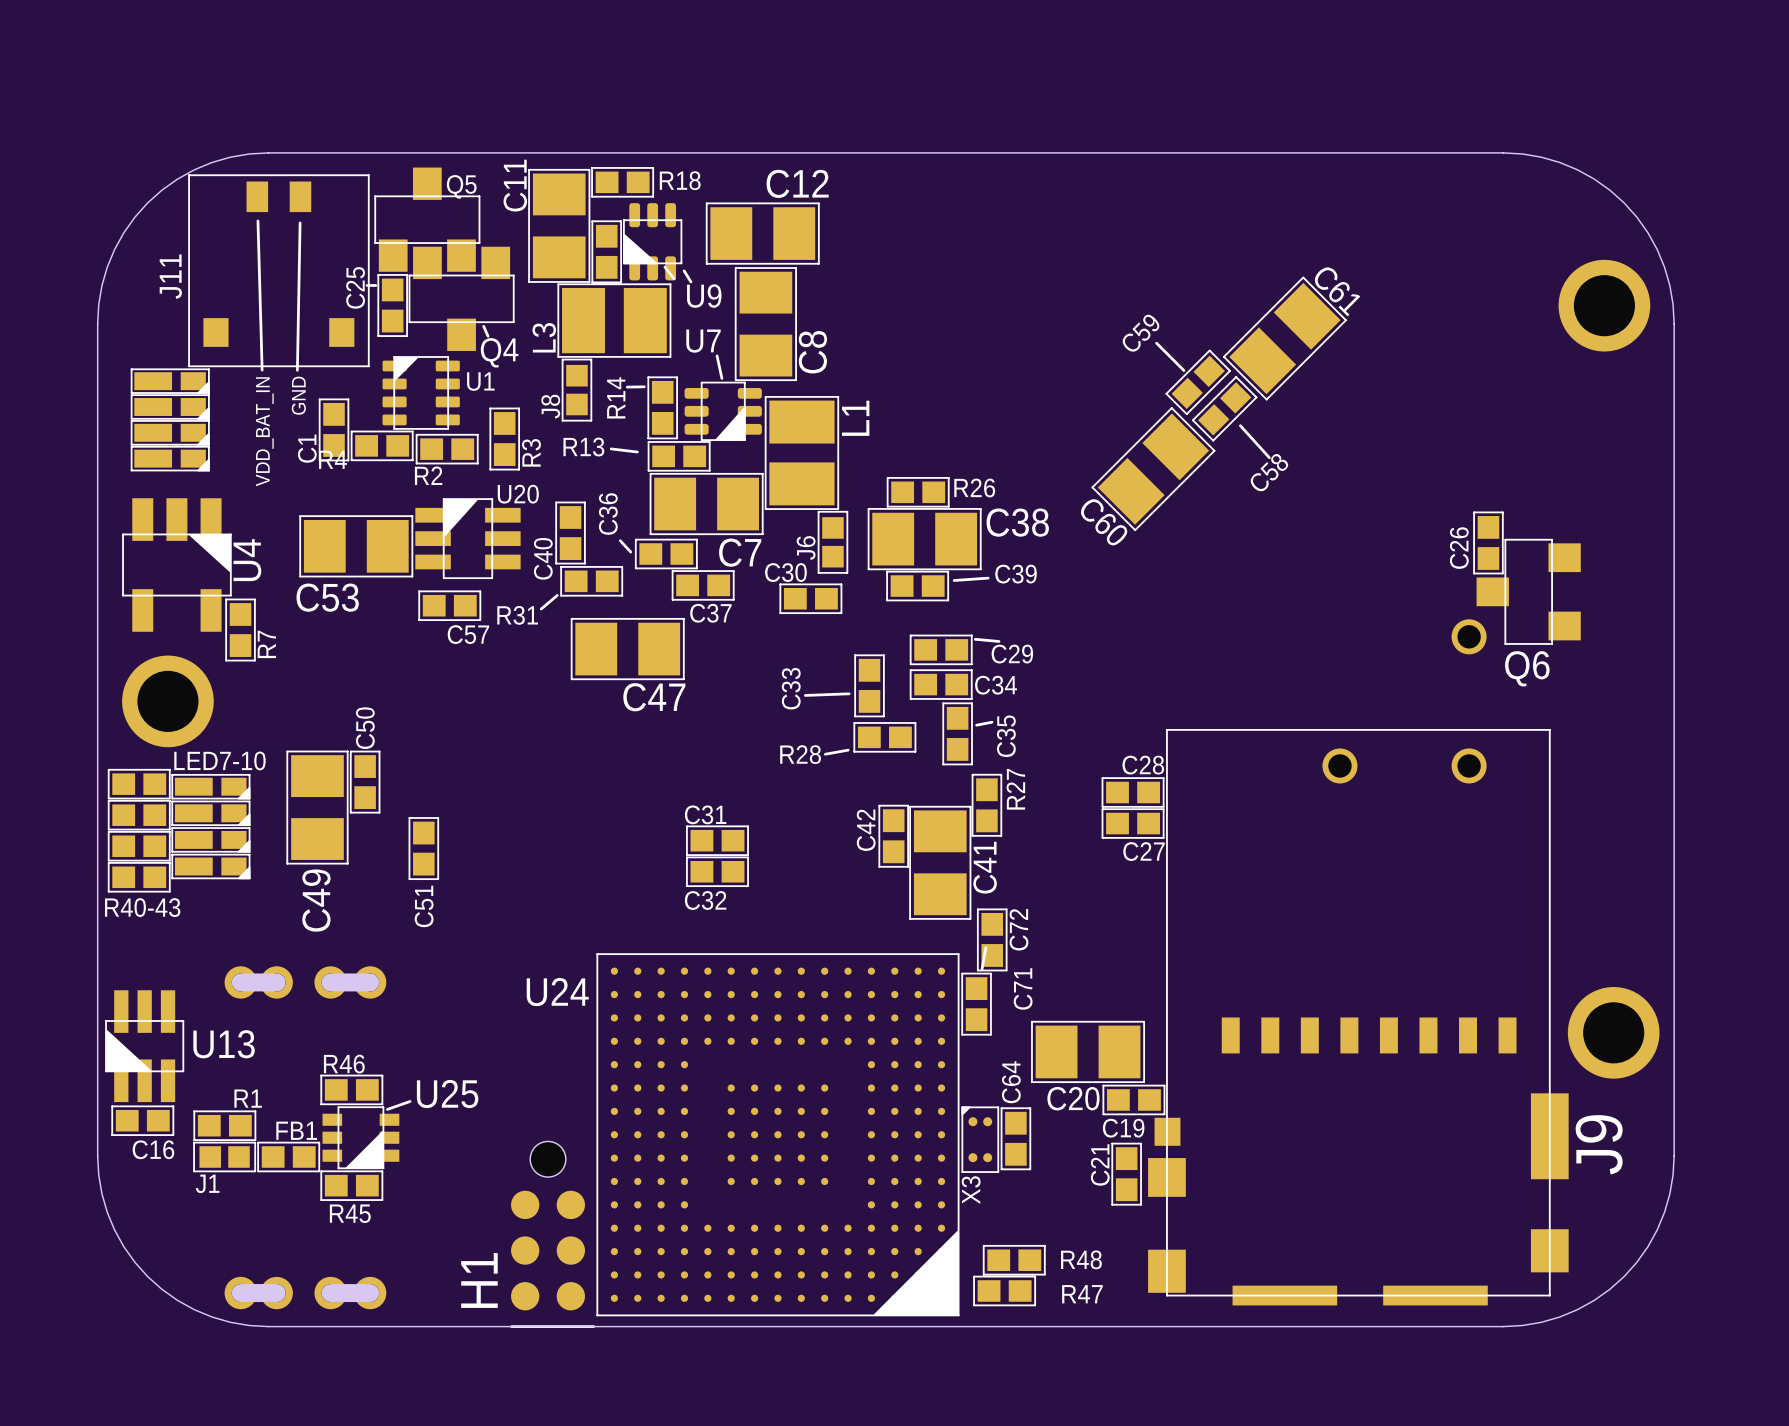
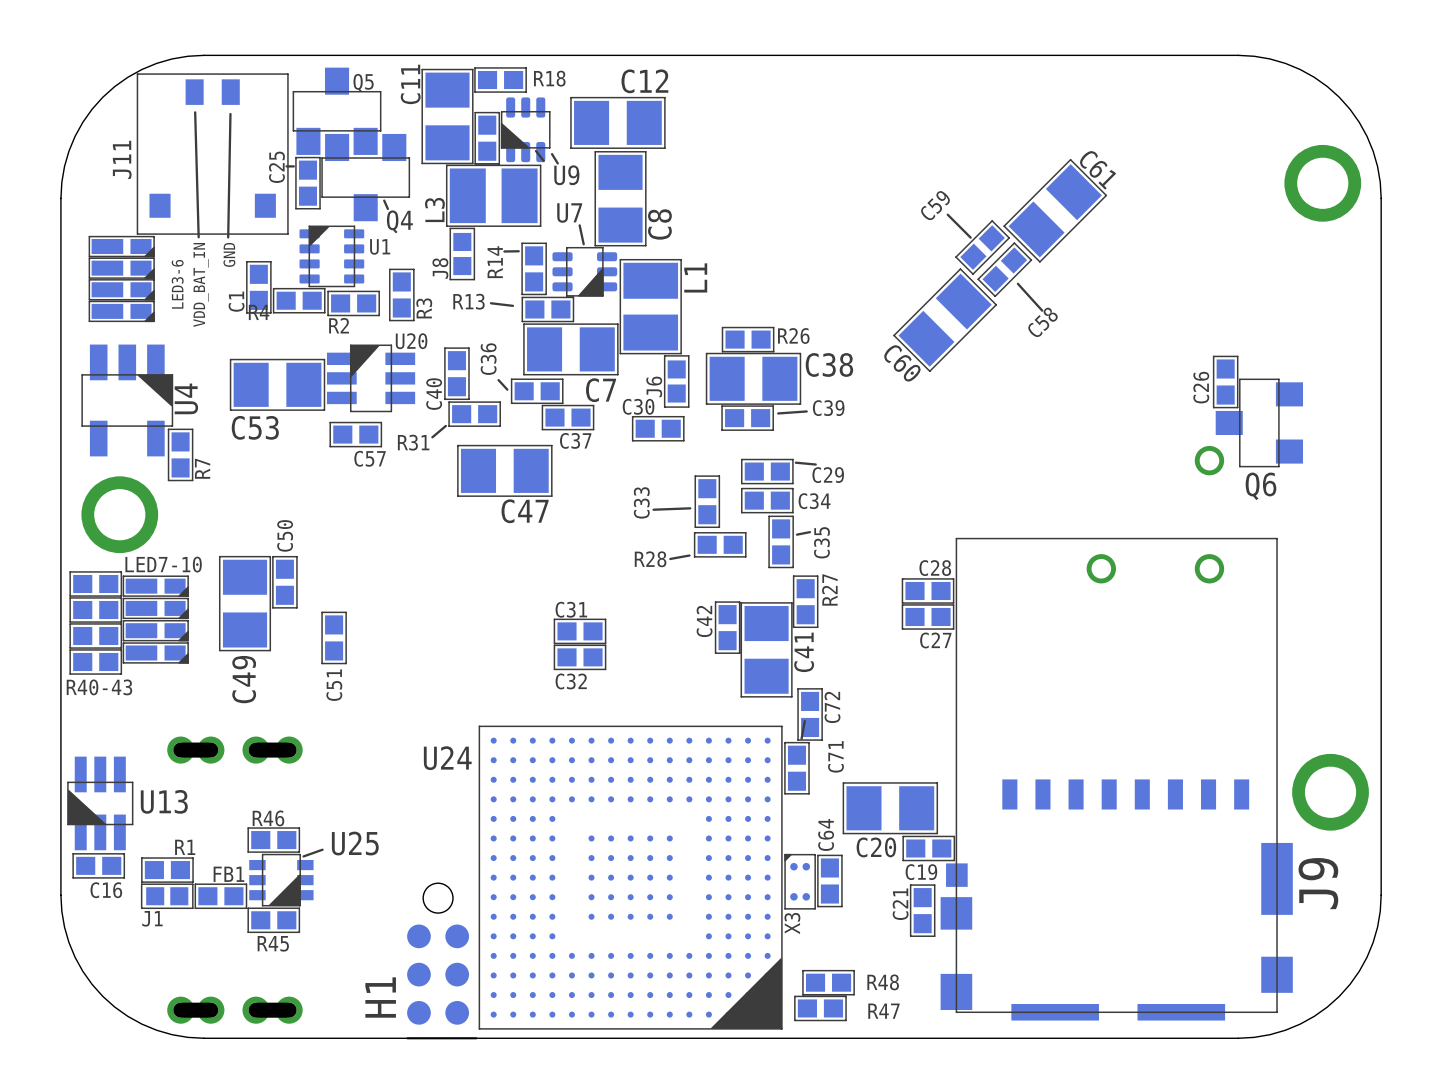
text: none -> LED3-6 (177, 284)

